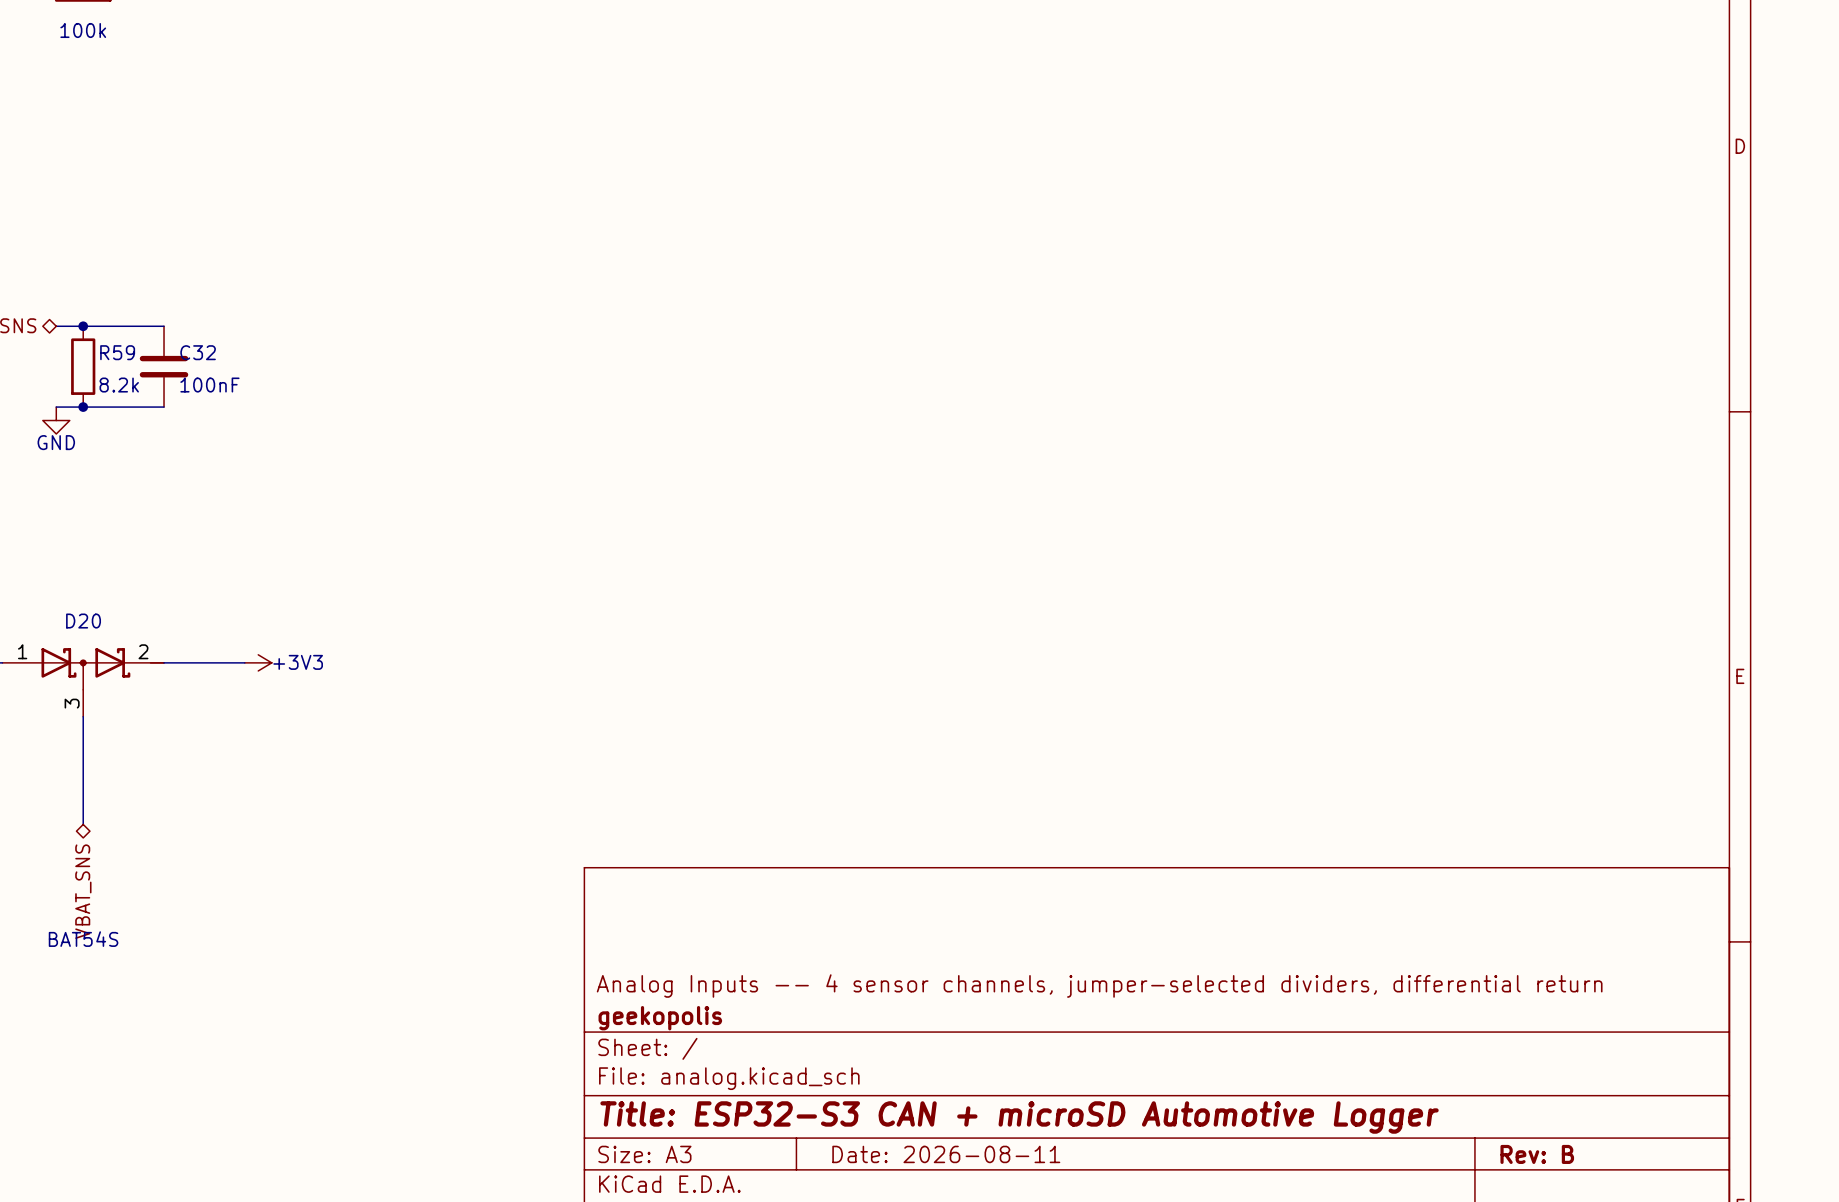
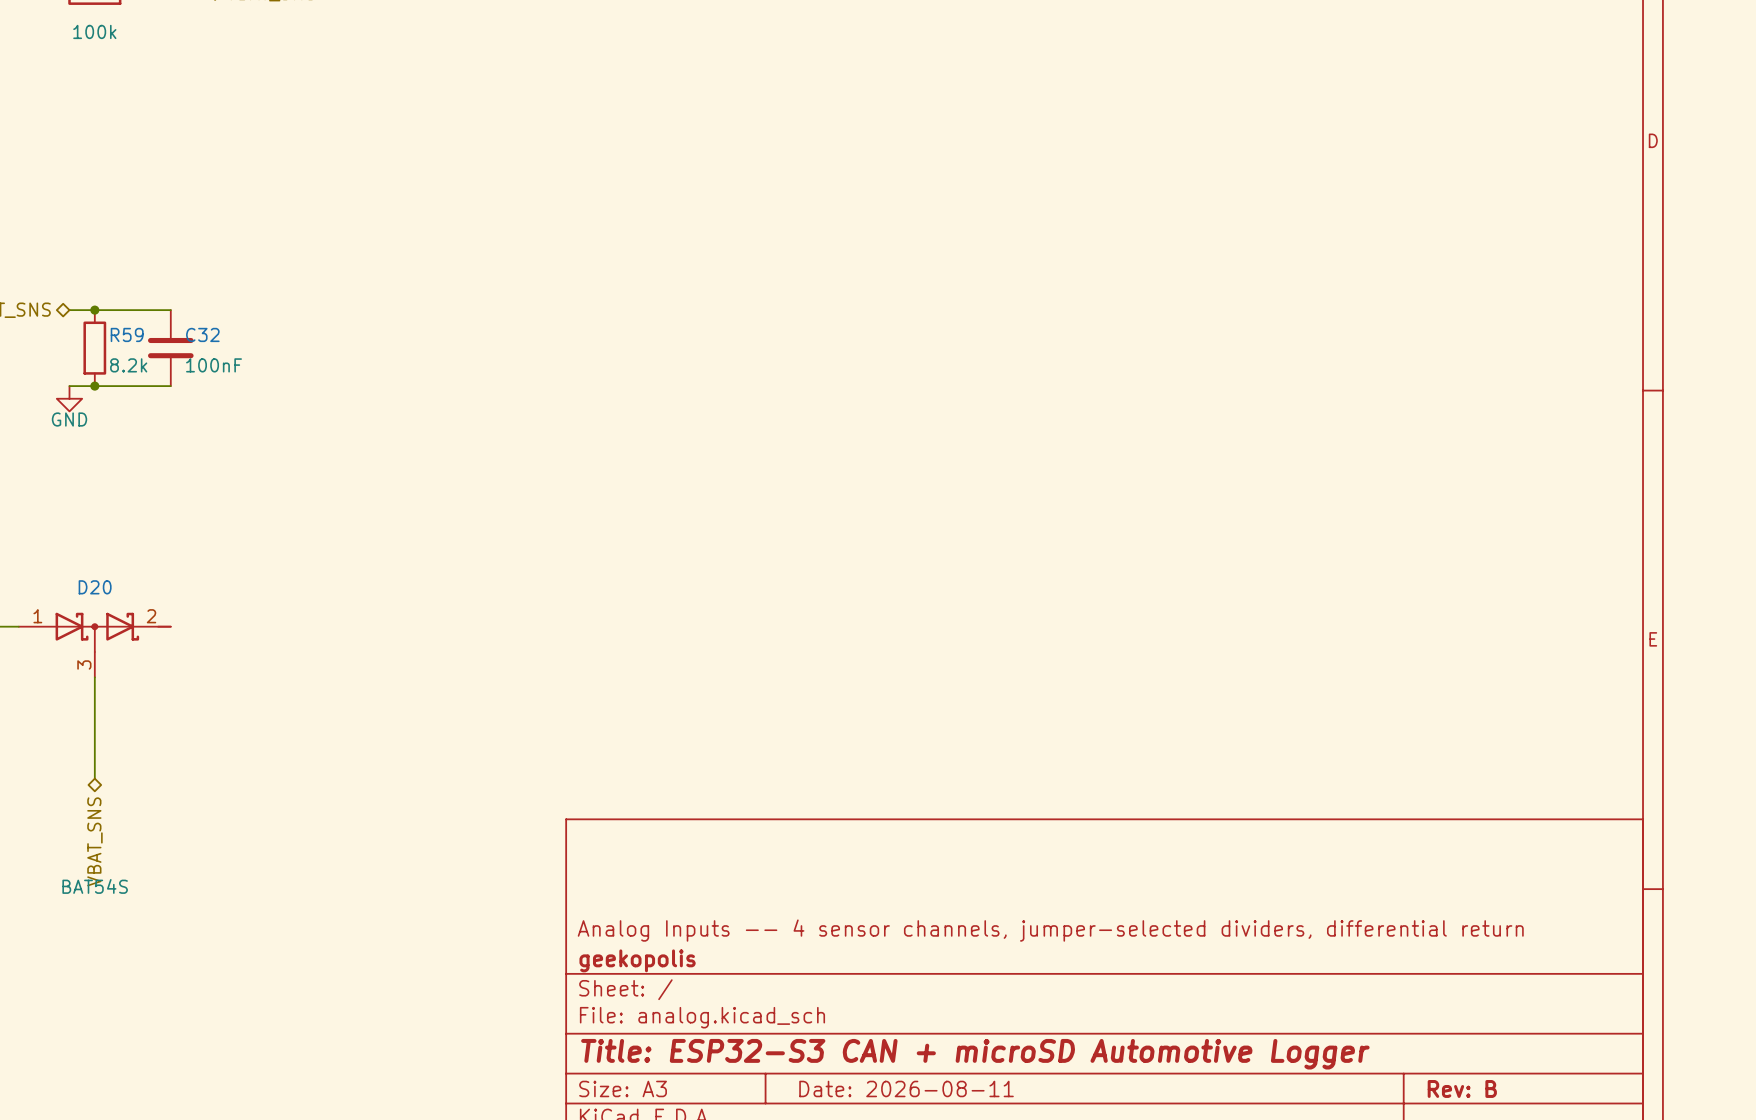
wire: (164, 662) (244, 662) -> none
power symbol: +3V3 (258, 662) -> none

